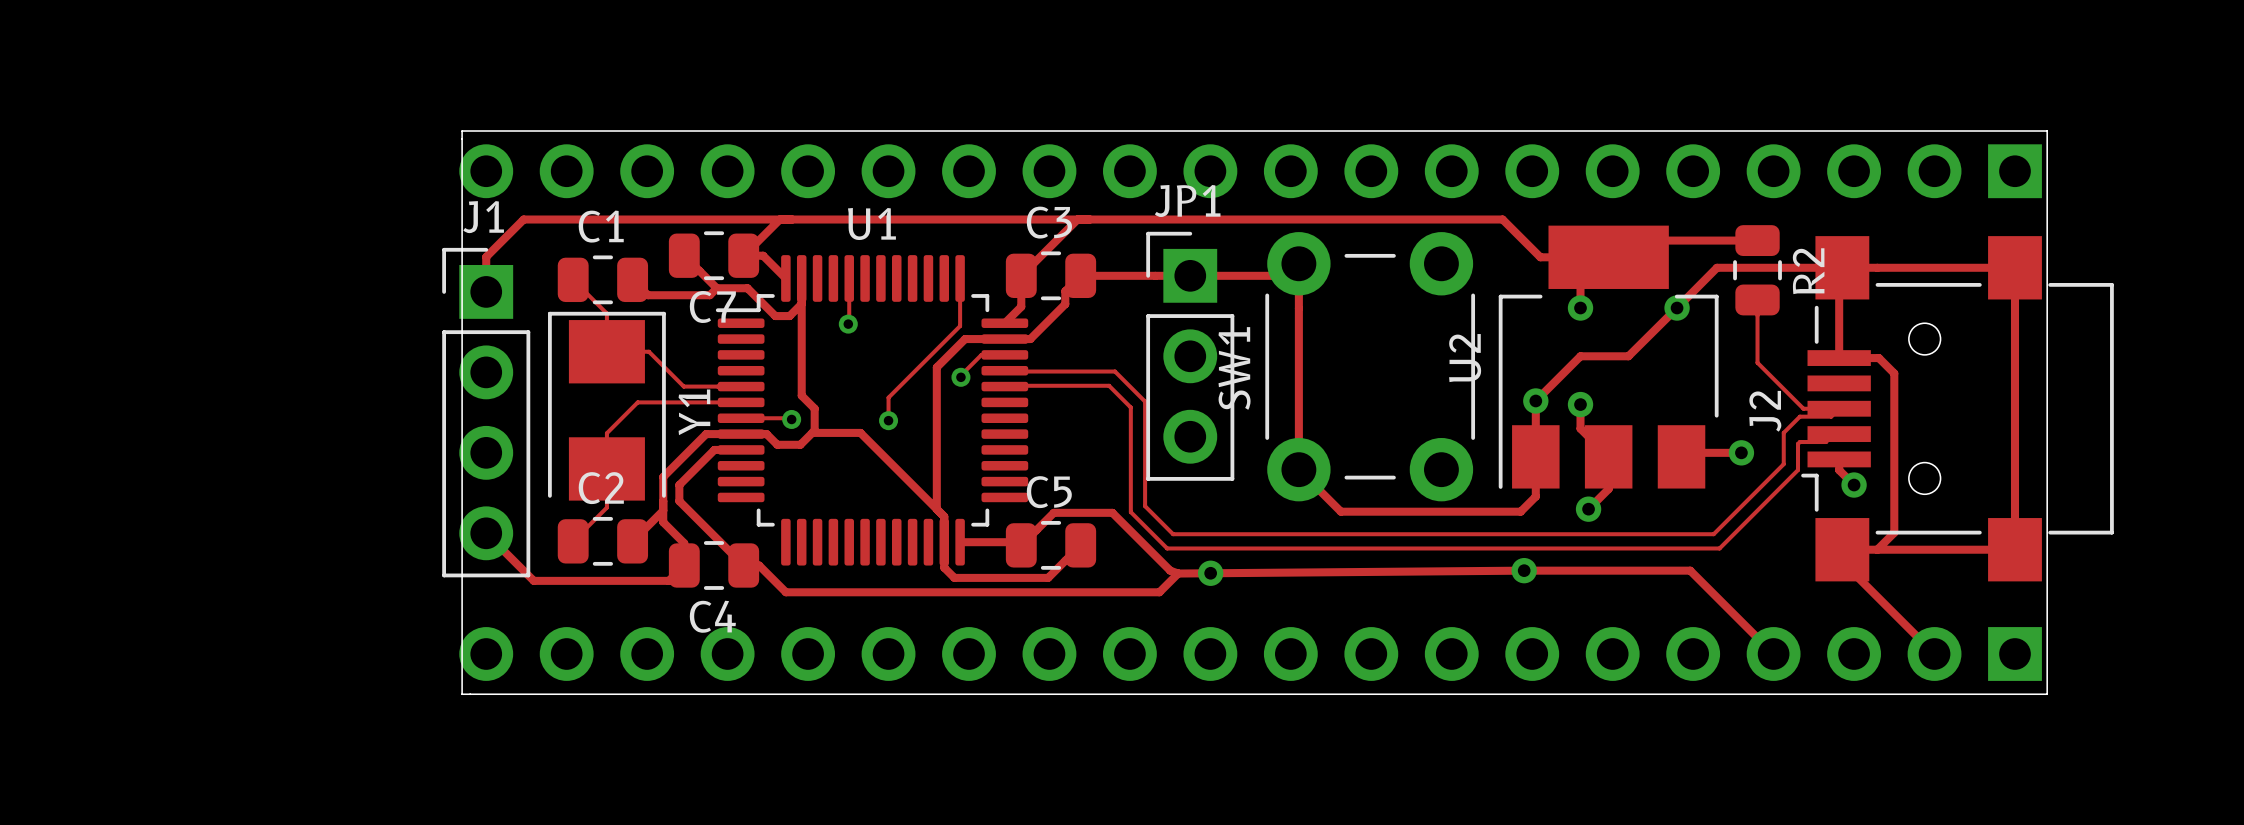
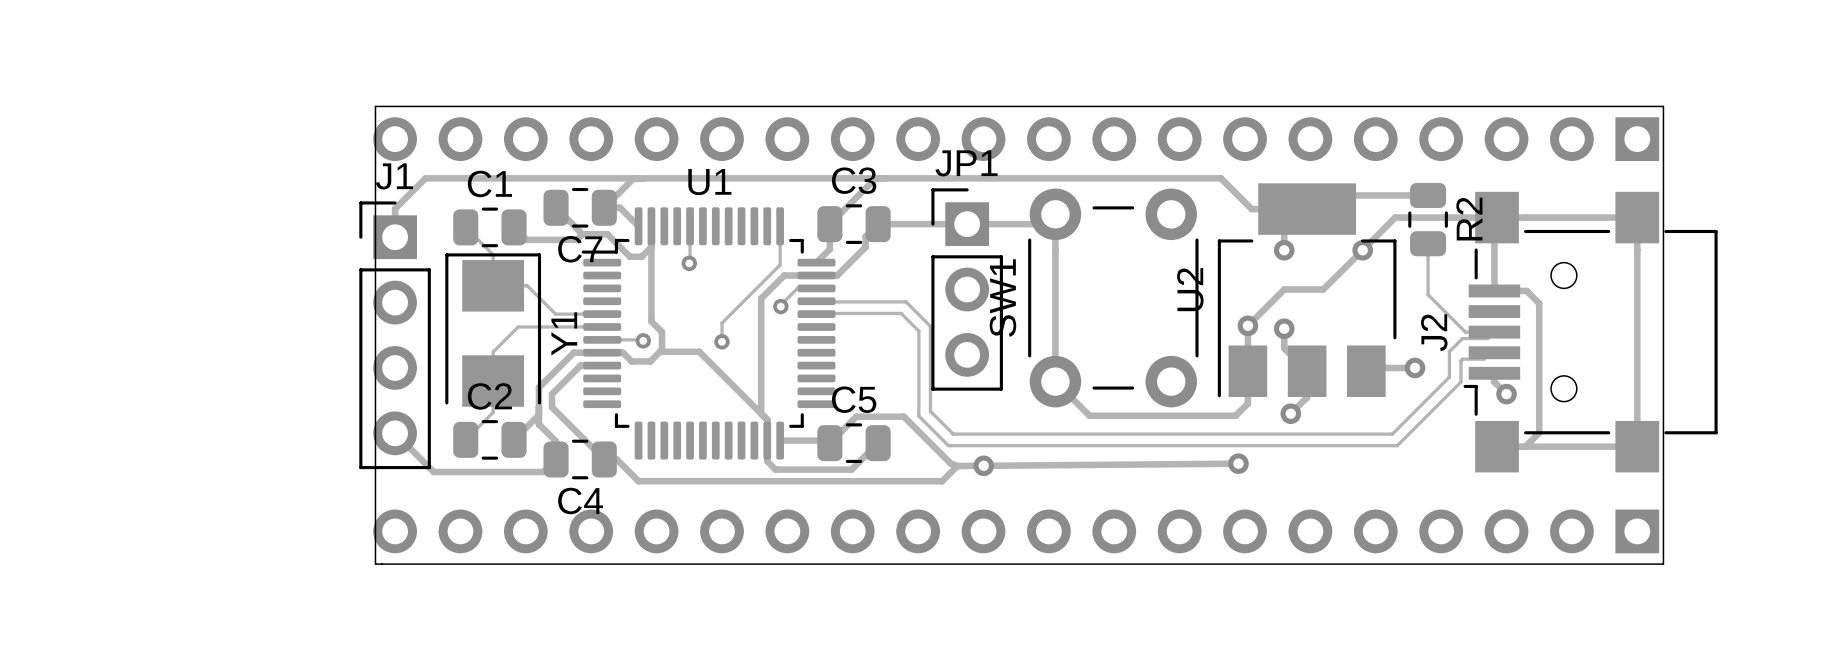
track: (1842, 549) (1842, 561) (1934, 654) -> none
track: (1524, 570) (1690, 570) (1773, 654) -> none

